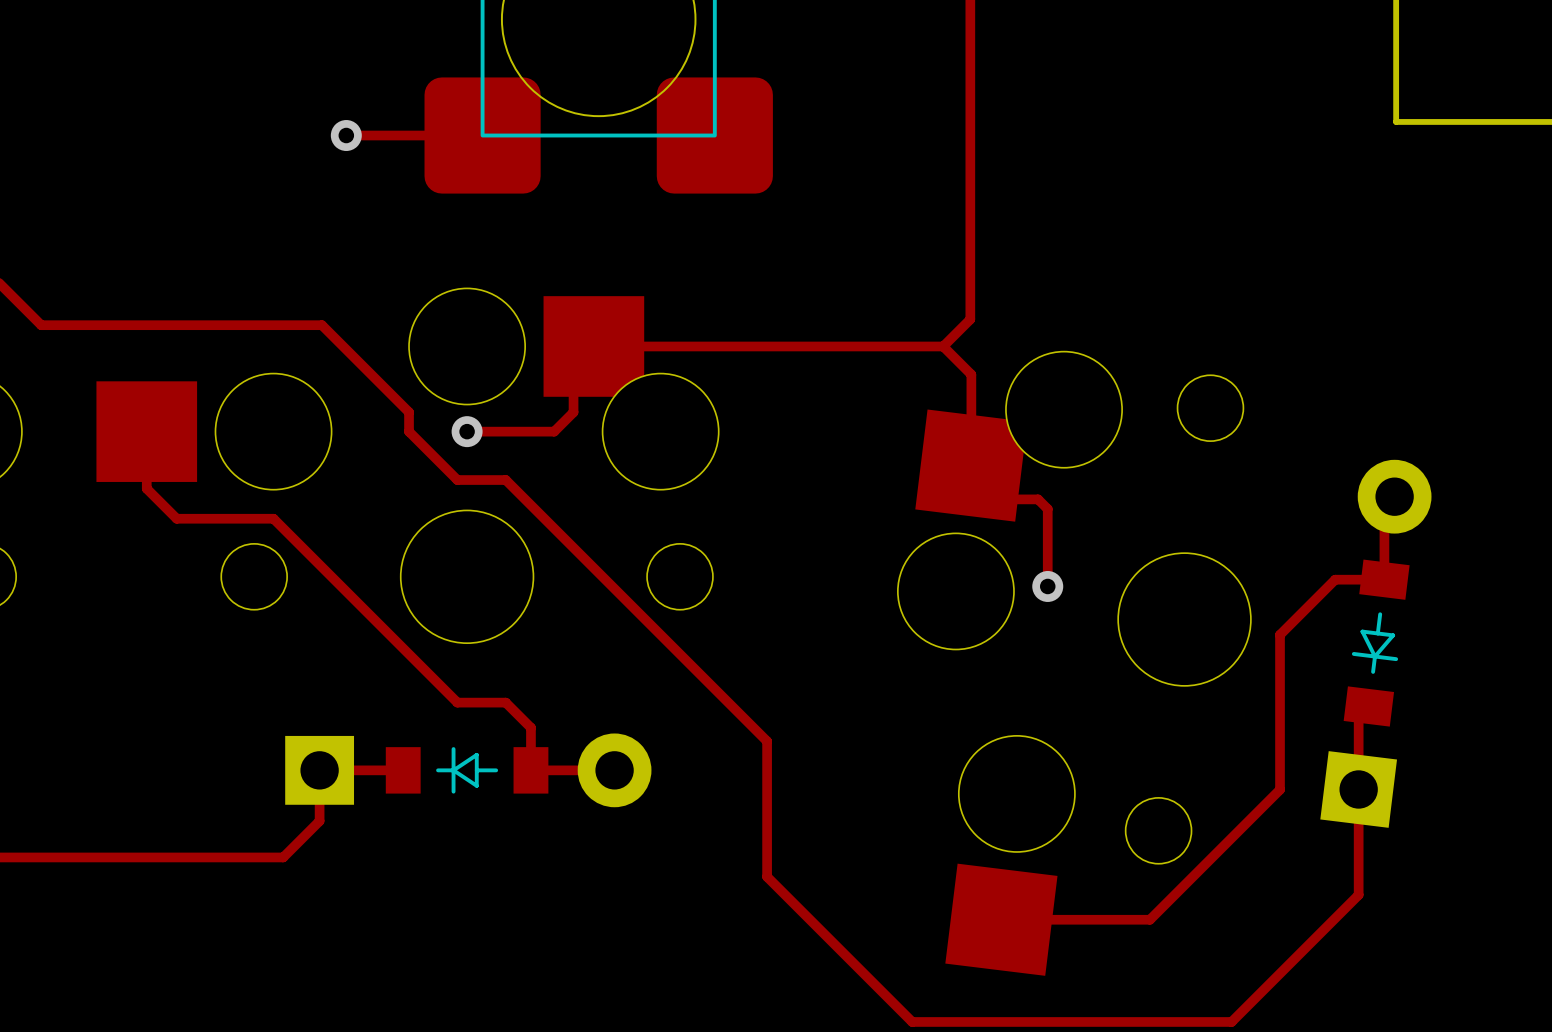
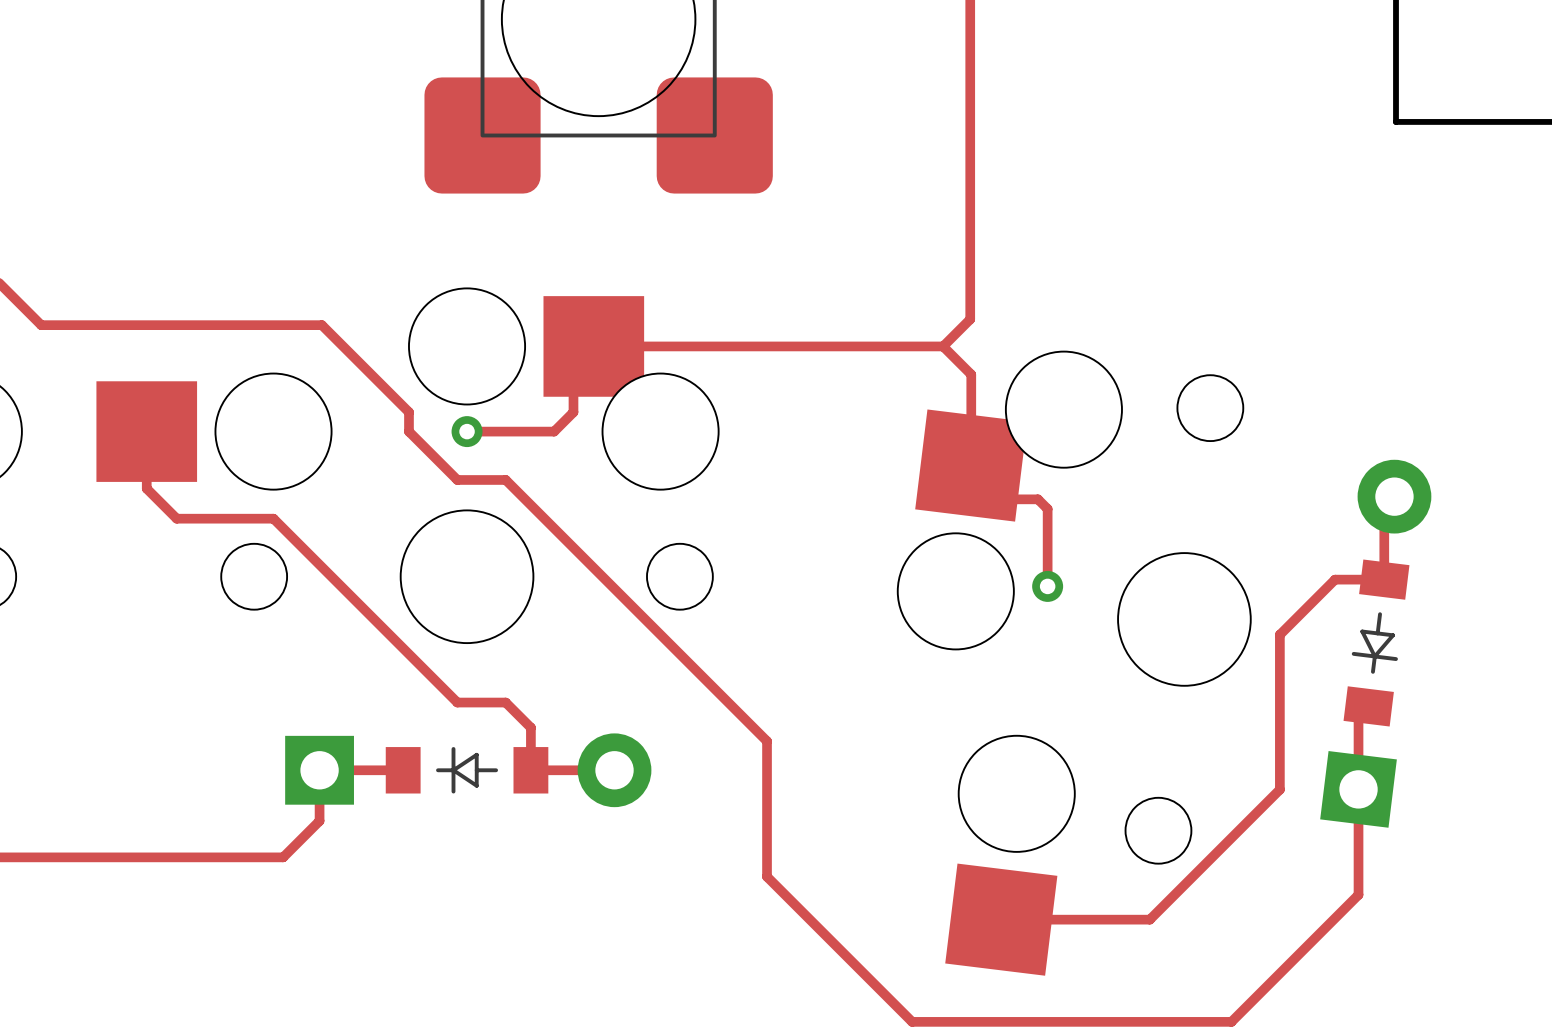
track: (346, 135) (482, 135) -> none
via: (346, 135) -> none

